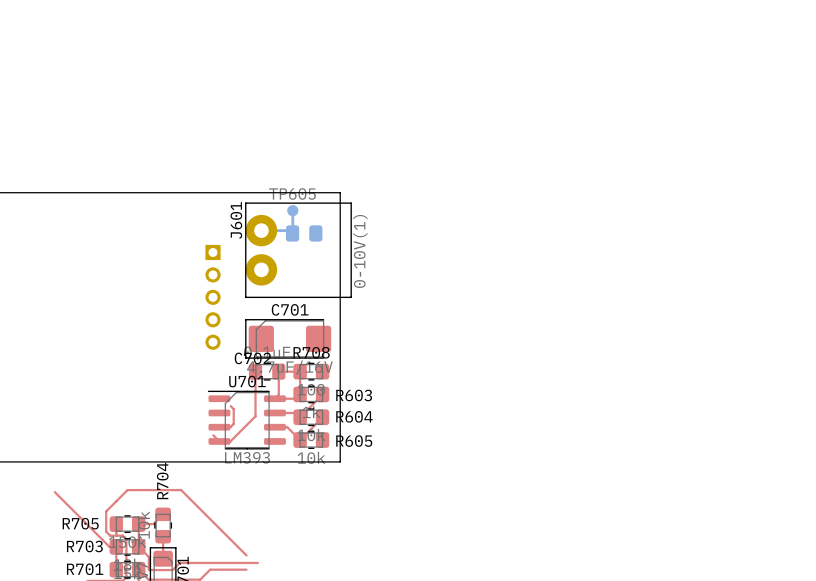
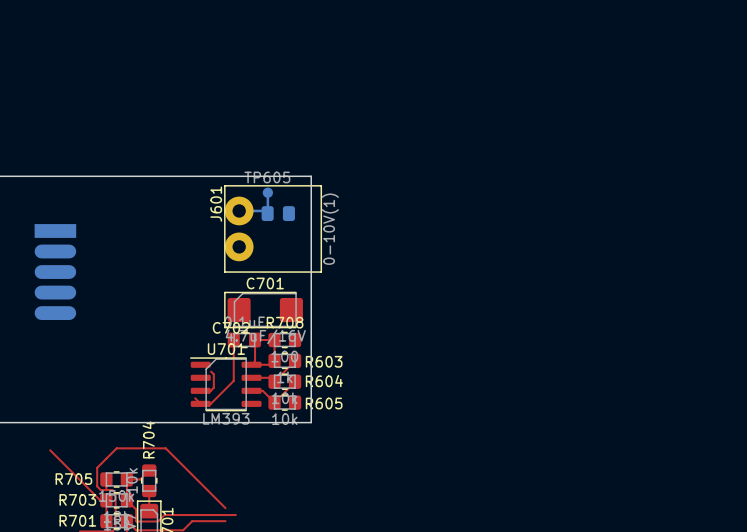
part: none -> (55, 272)
part: (213, 297) -> none

